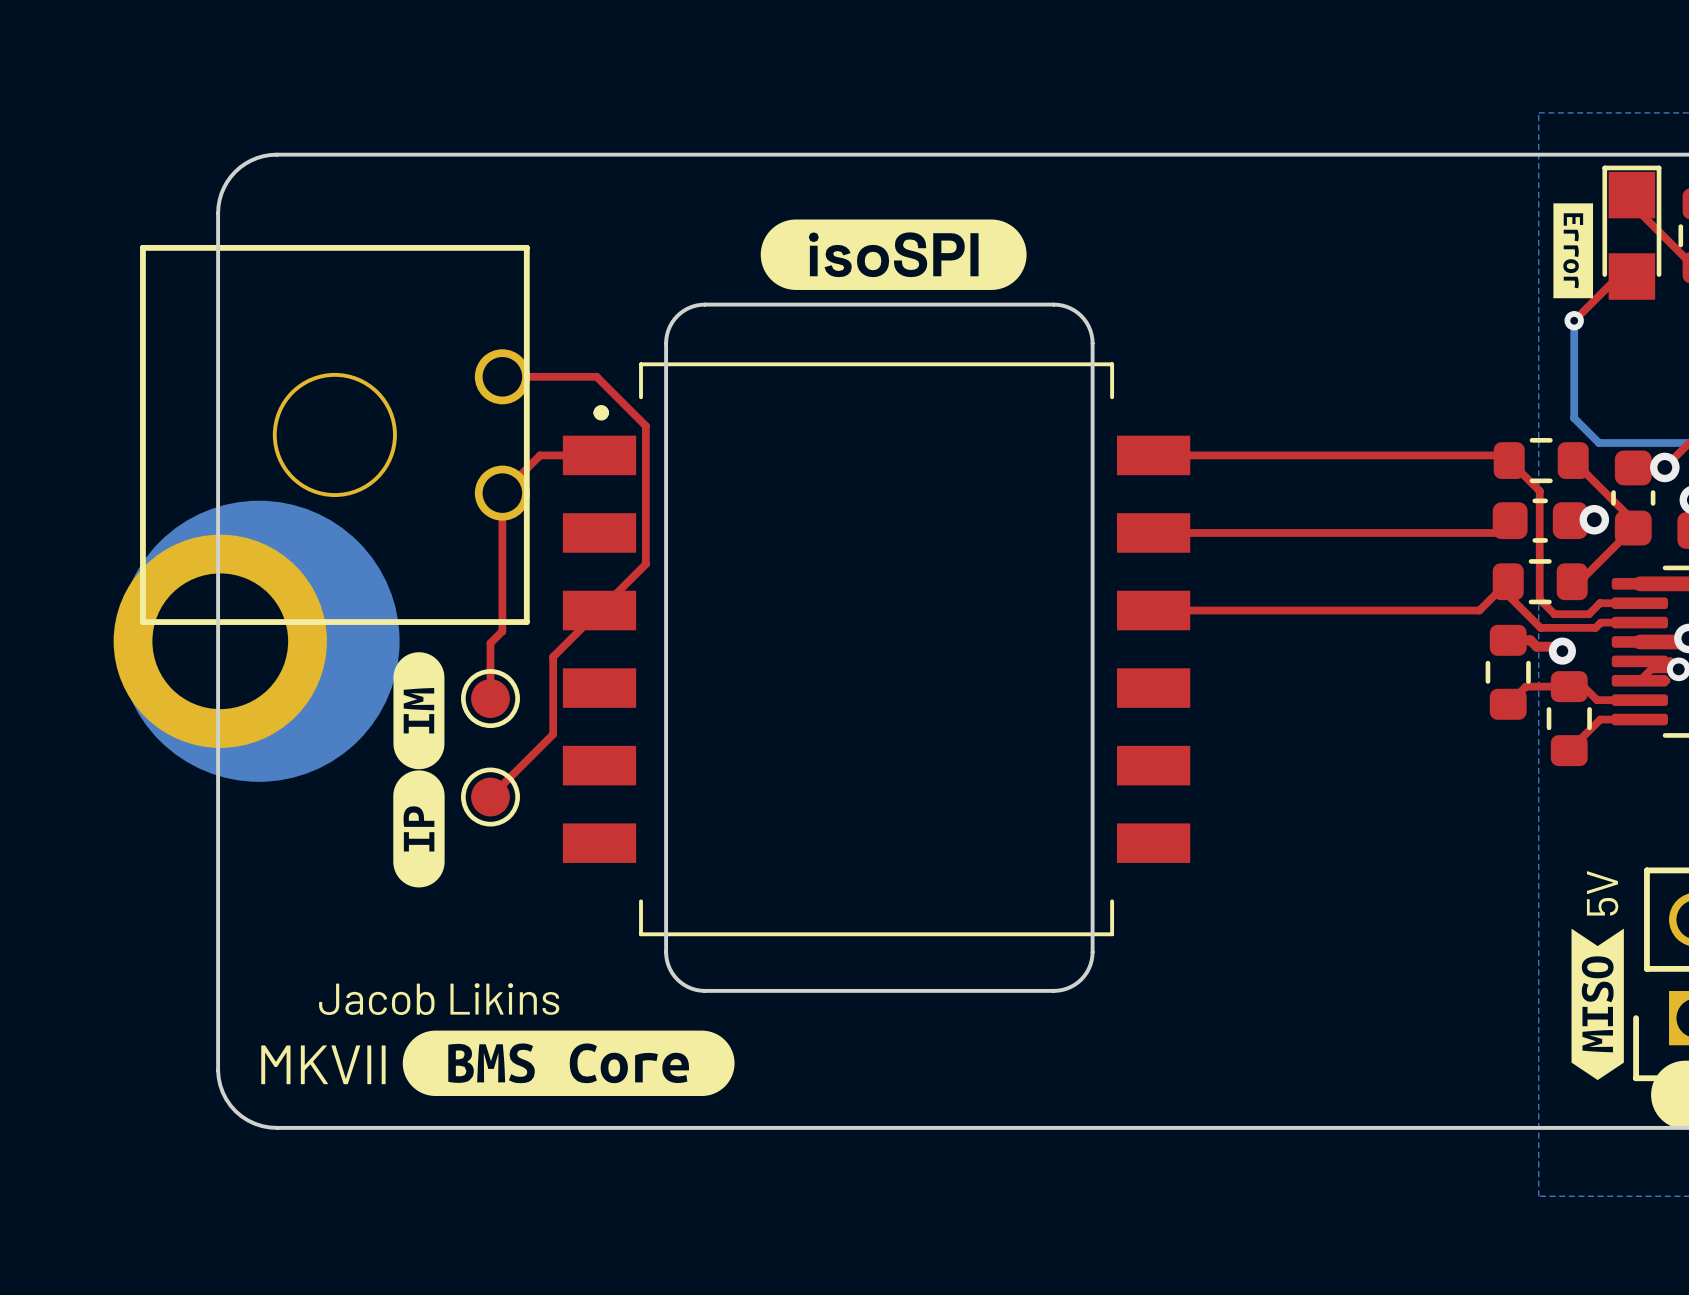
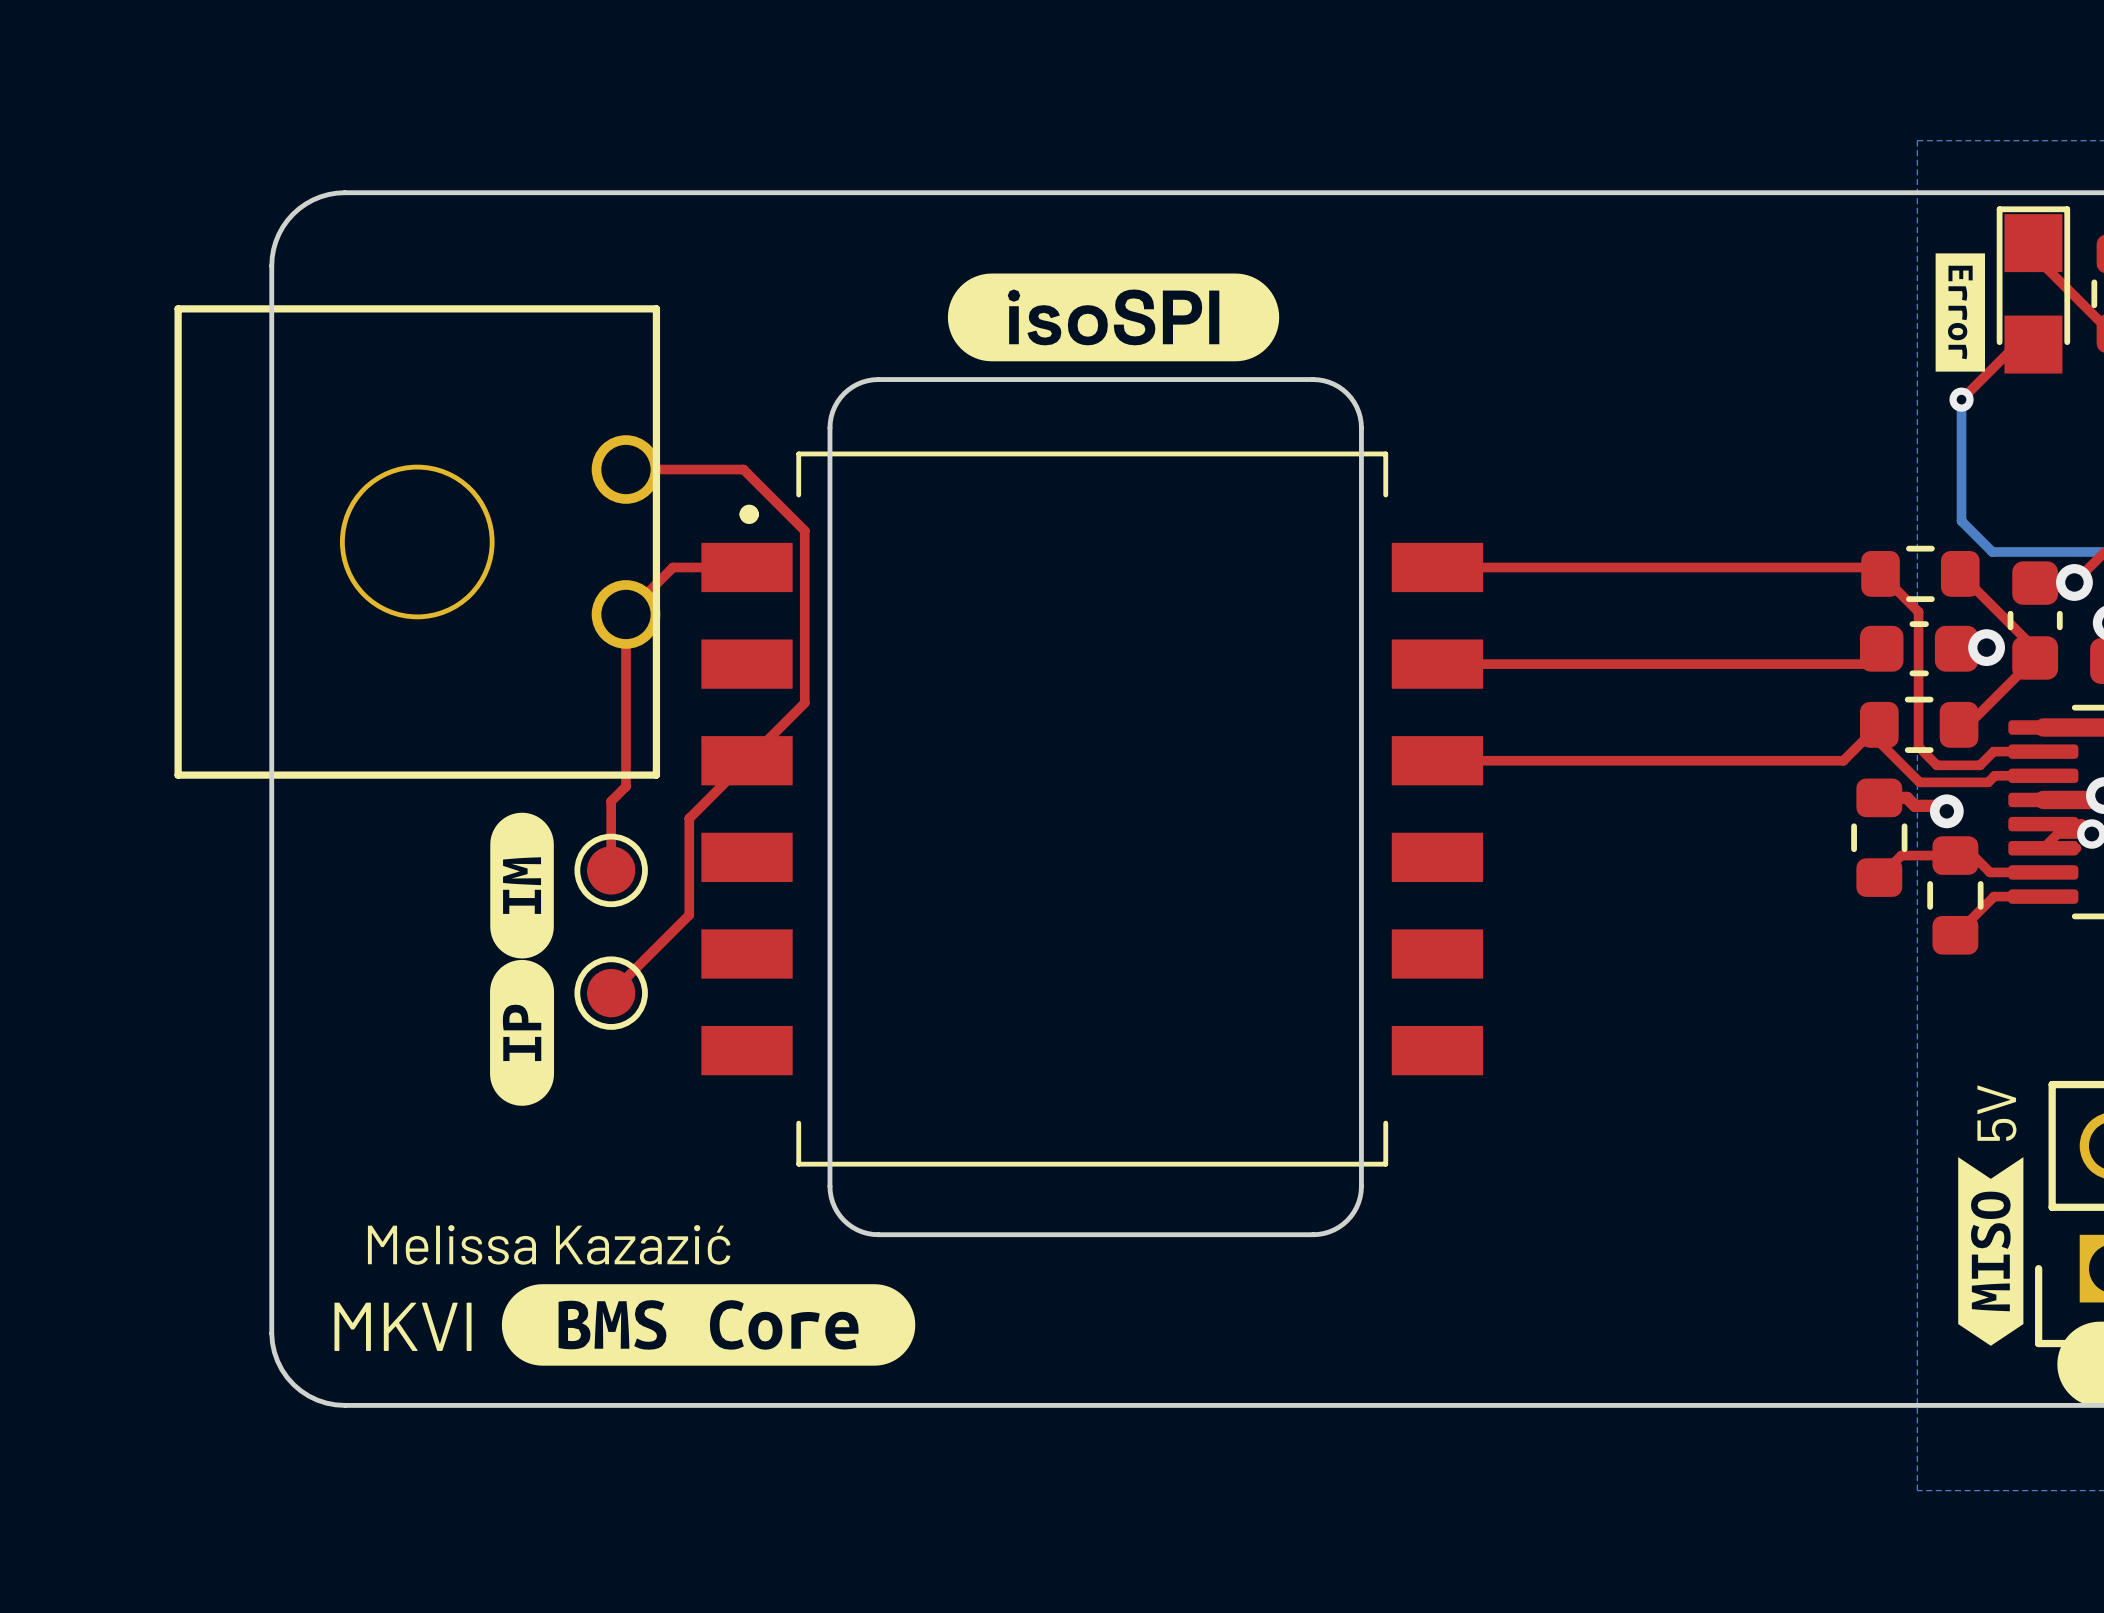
part: (256, 641) -> none
text: Jacob Likins (439, 999) -> Melissa Kazazić (549, 1244)
text: MKVII (323, 1064) -> MKVI (403, 1326)

